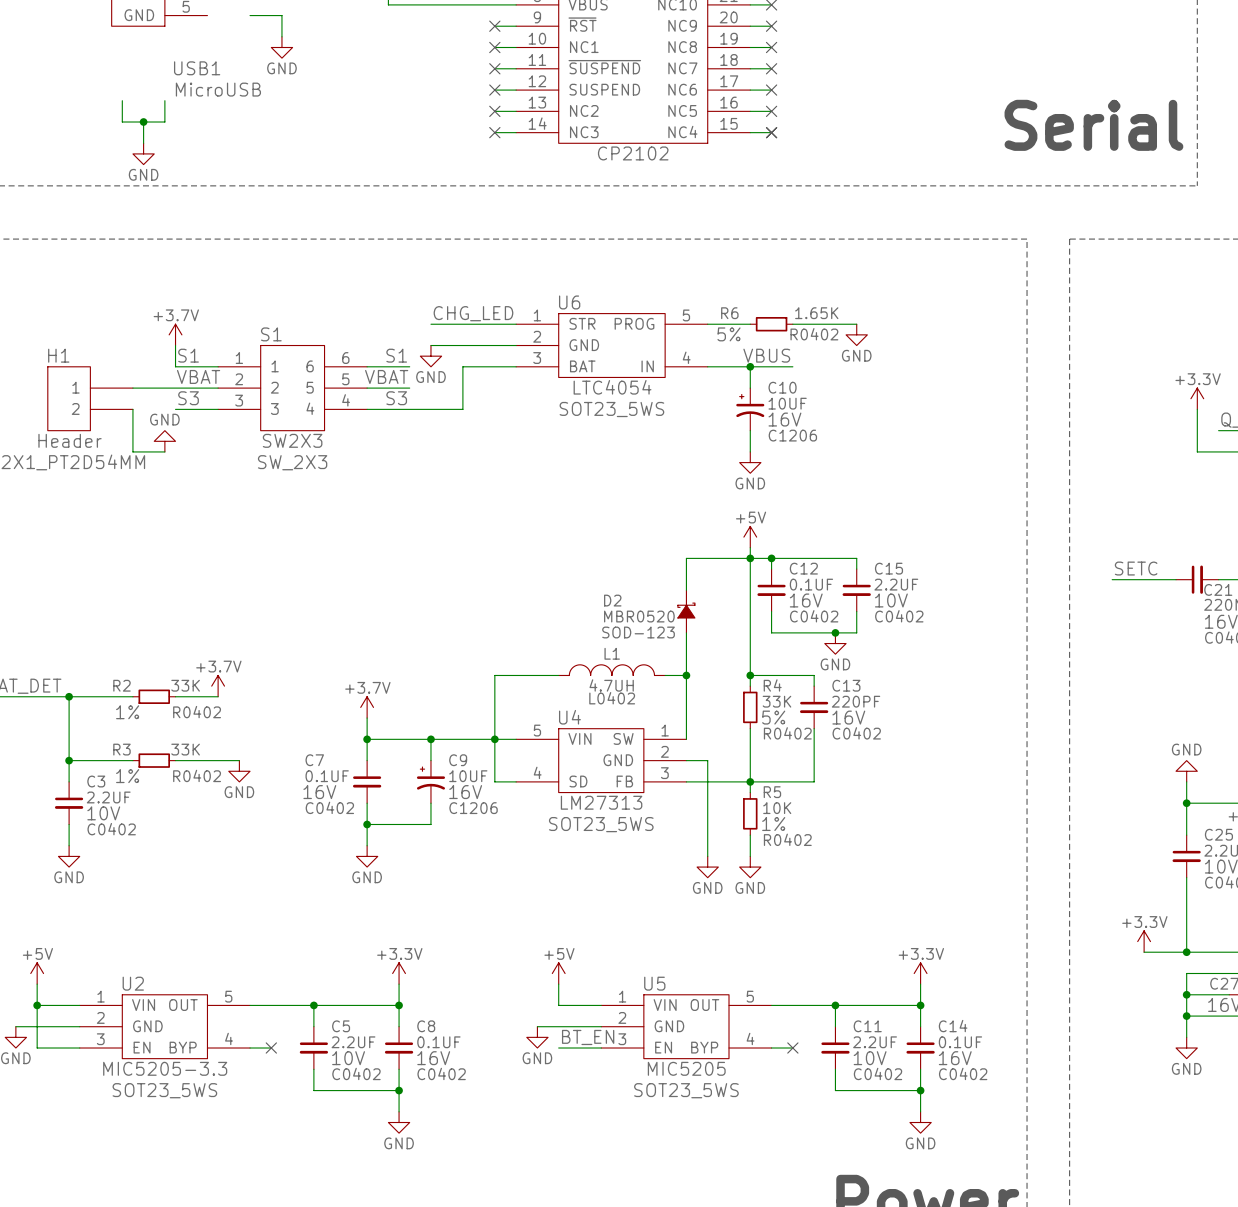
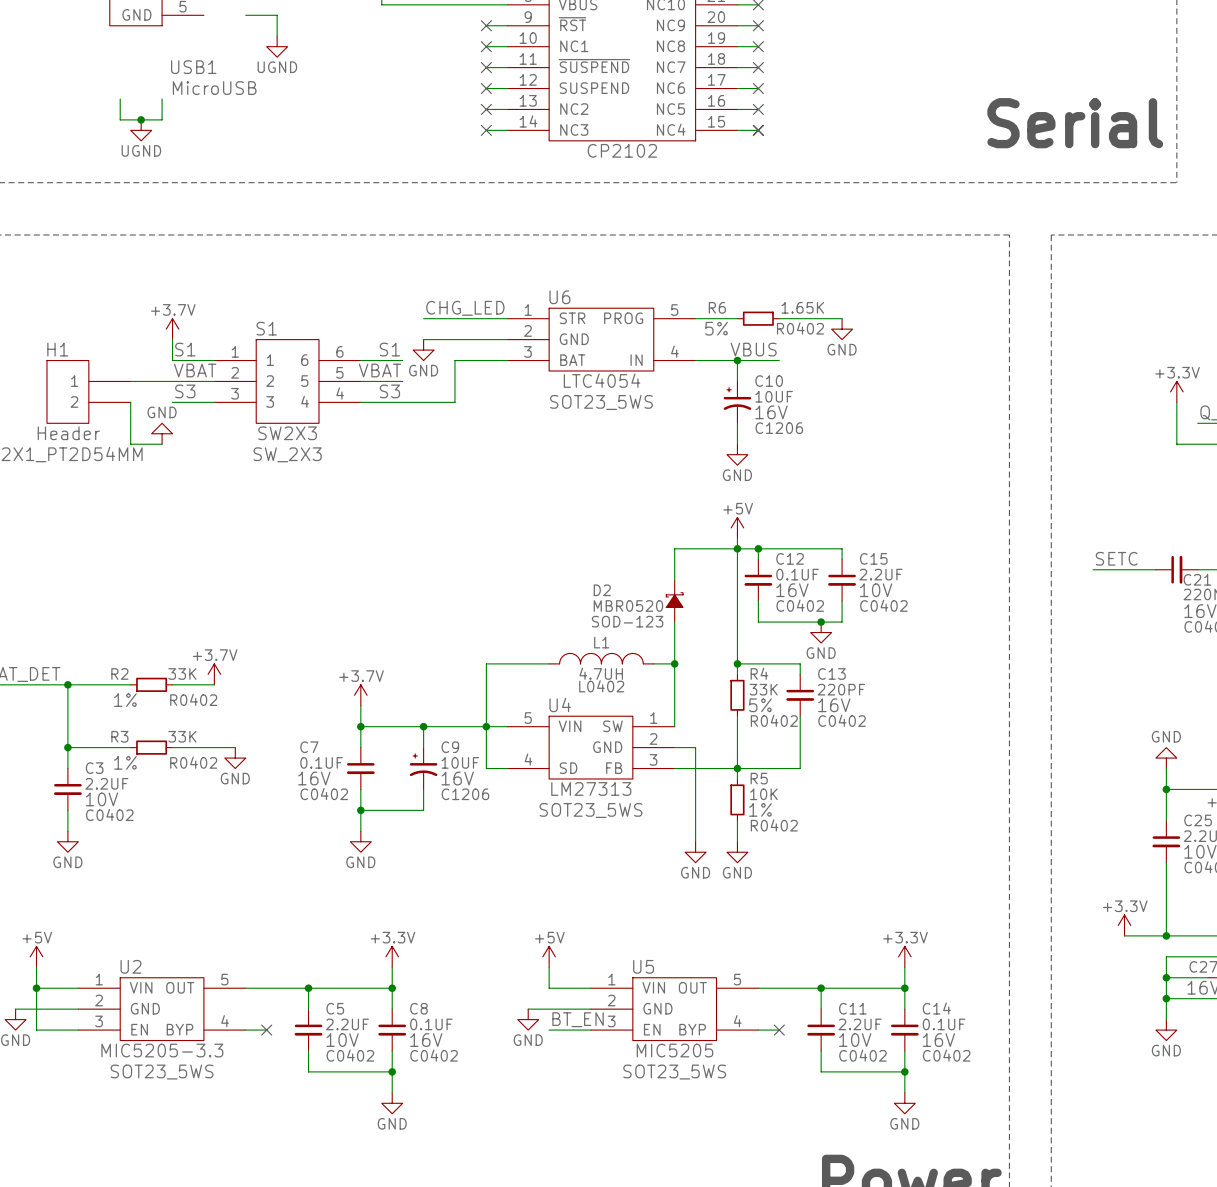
power symbol: GND (281, 47) -> UGND (277, 46)
power symbol: none -> UGND (141, 130)
power symbol: GND (143, 153) -> none

